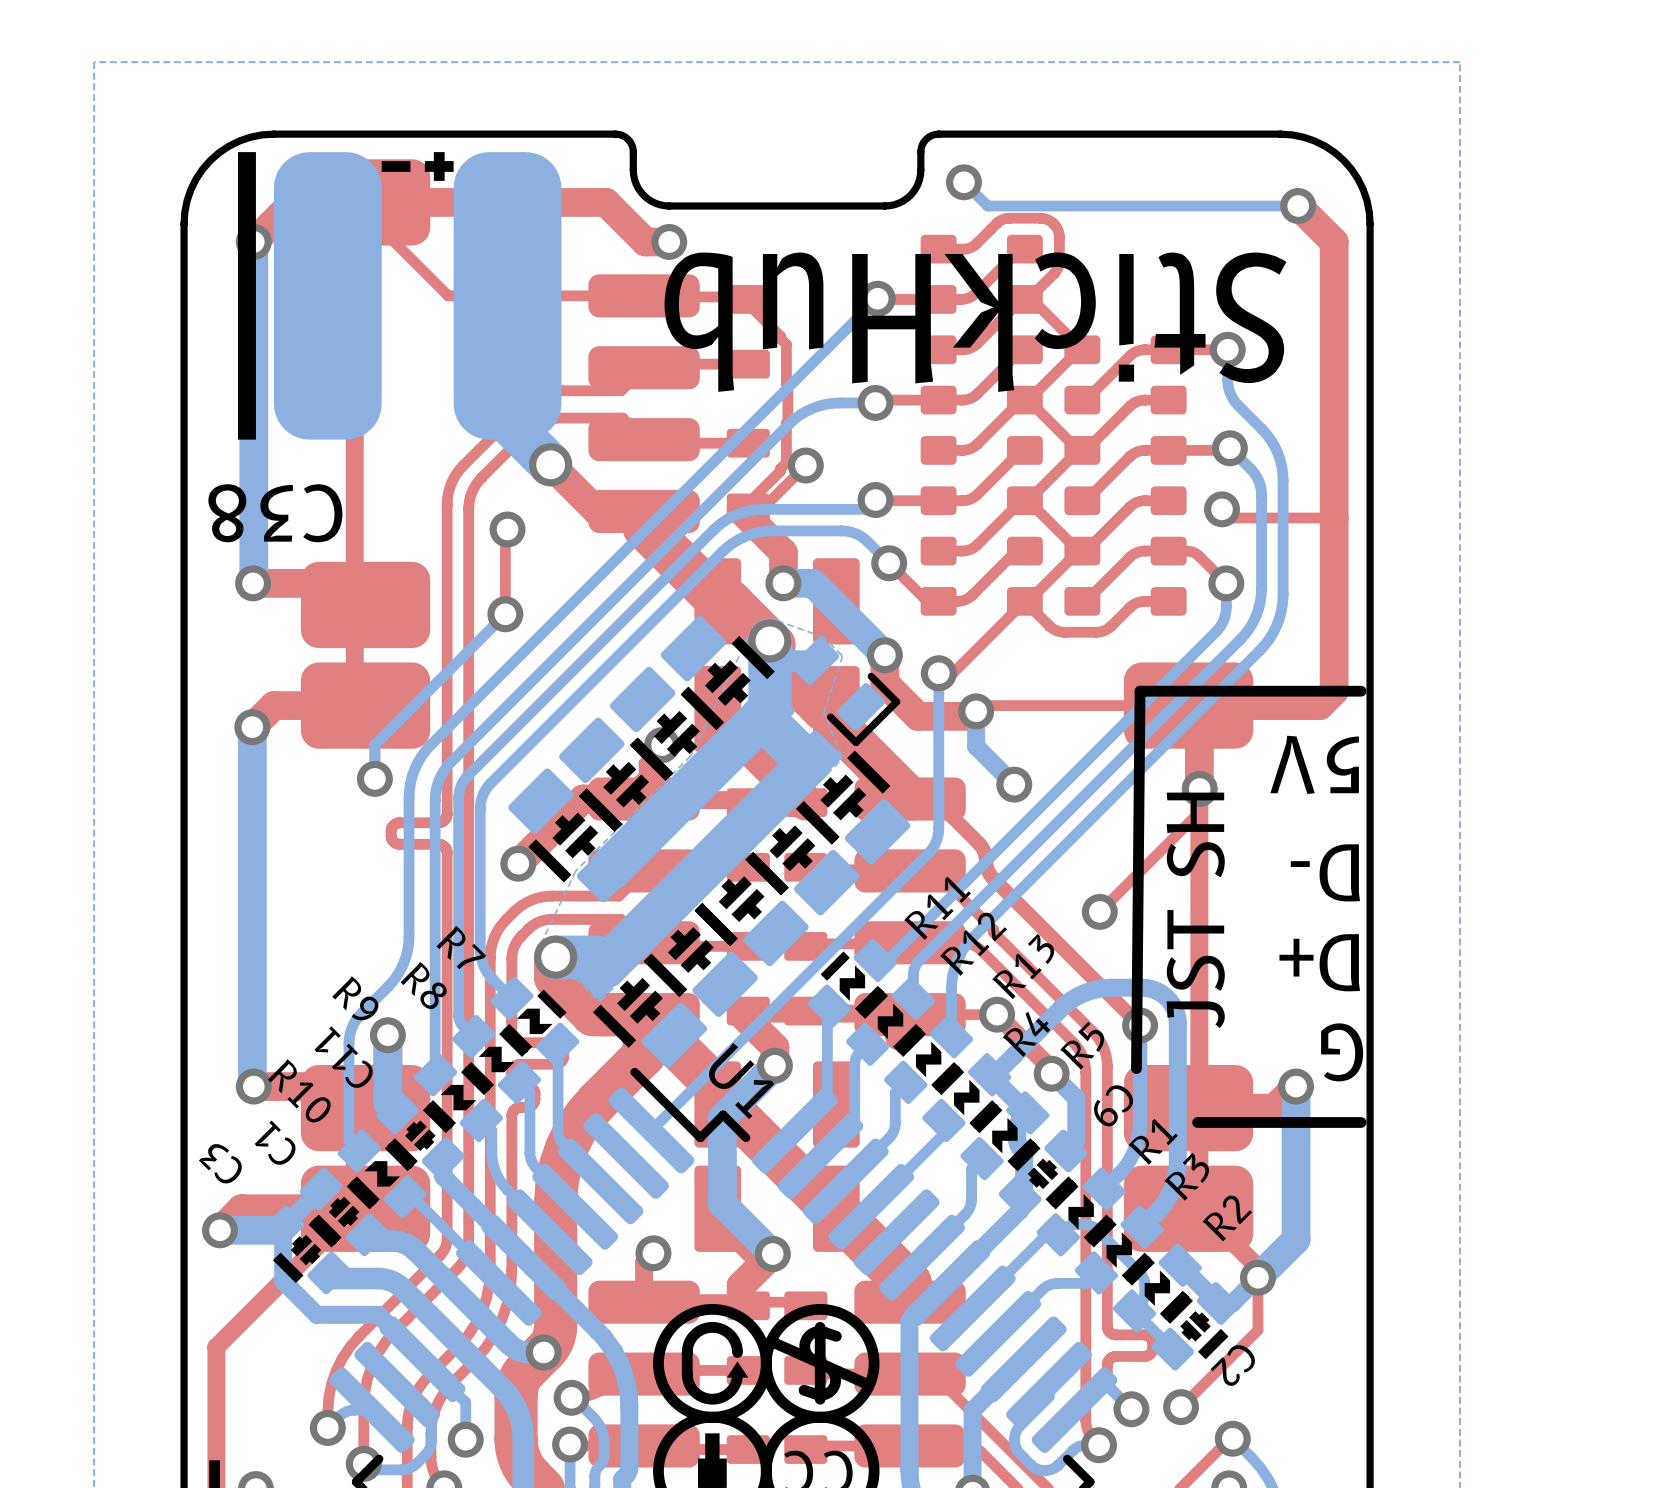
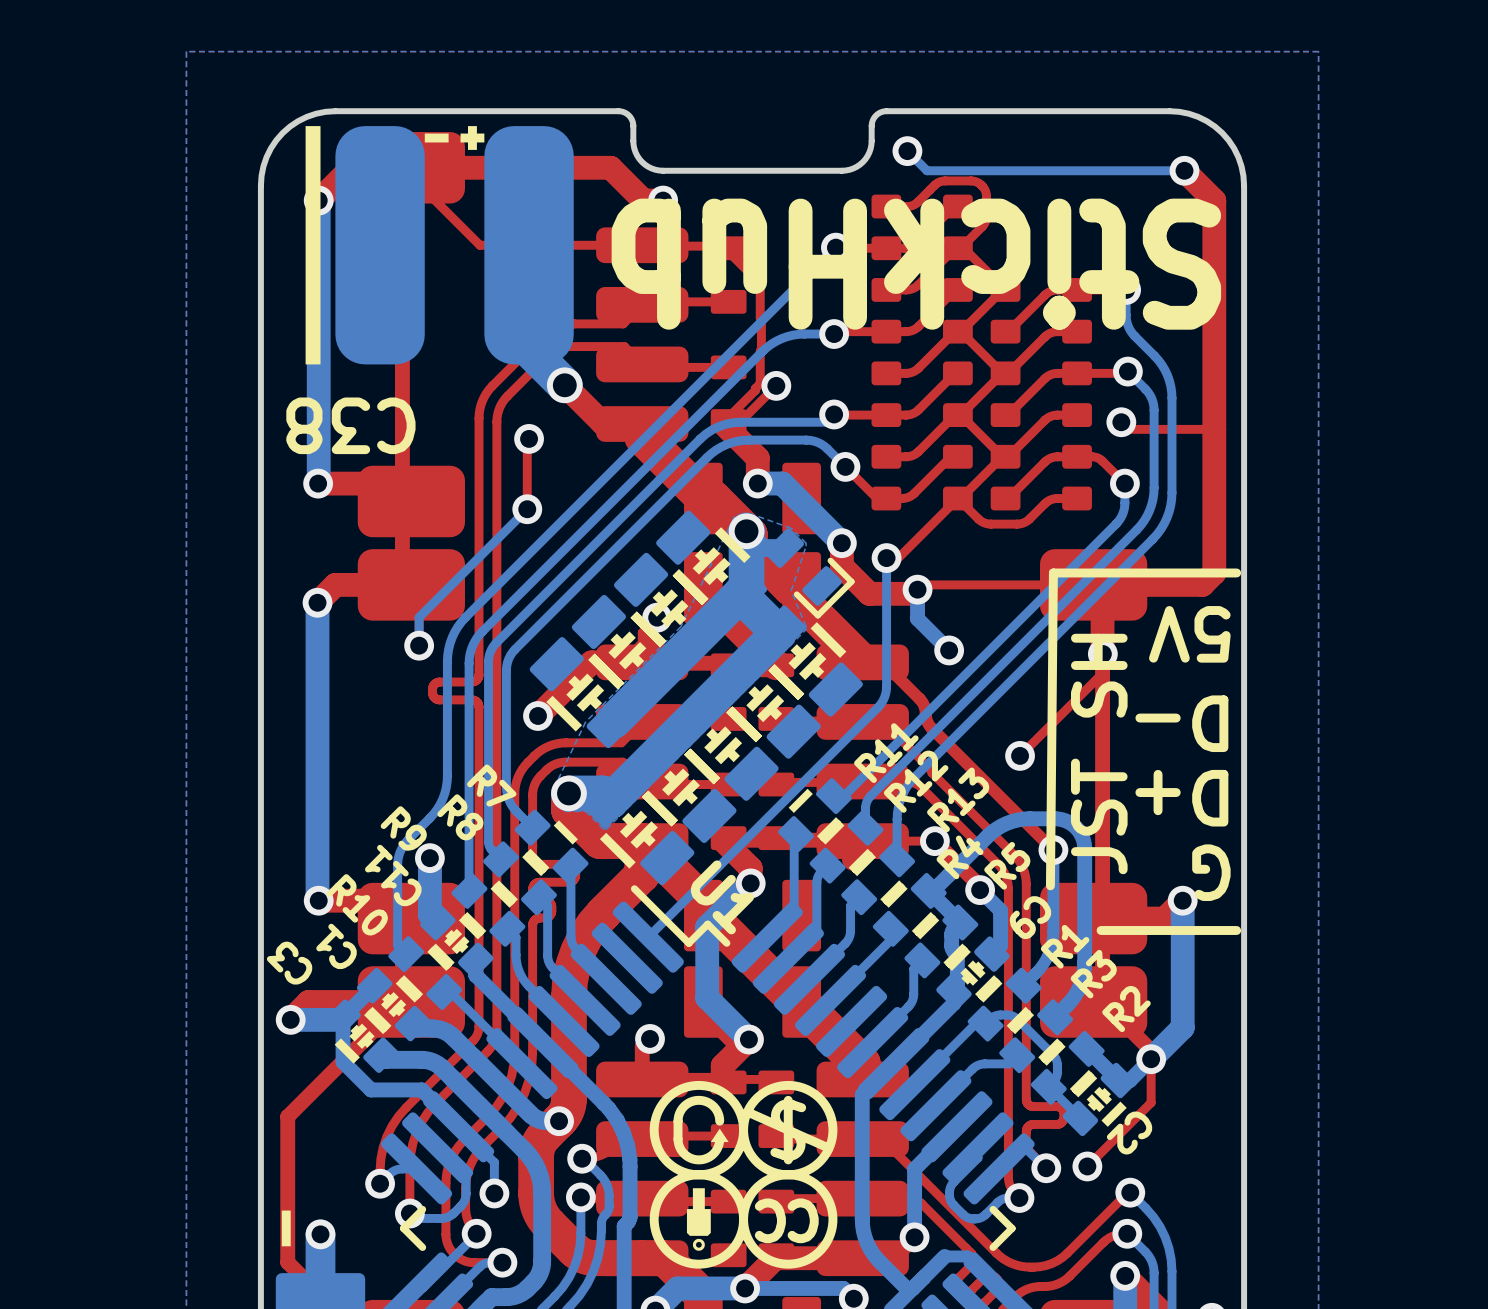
R11 footprint: [807, 938, 897, 1028] -> [778, 778, 852, 853]
R7 footprint: [490, 976, 580, 1066] -> [514, 809, 589, 884]
R12 footprint: [845, 976, 936, 1066] -> [809, 809, 884, 884]
R8 footprint: [452, 1014, 542, 1105] -> [483, 841, 557, 916]
R13 footprint: [884, 1014, 974, 1105] -> [841, 841, 916, 916]
R9 footprint: [413, 1053, 504, 1143] -> [451, 872, 526, 947]
R4 footprint: [922, 1053, 1012, 1143] -> [872, 872, 947, 947]
R5 footprint: [960, 1091, 1050, 1181] -> [904, 904, 979, 979]
R10 footprint: [337, 1129, 427, 1219] -> [388, 936, 463, 1011]
R1 footprint: [1036, 1167, 1126, 1257] -> [967, 967, 1042, 1042]
R3 footprint: [1074, 1205, 1164, 1295] -> [999, 999, 1074, 1074]
R2 footprint: [1112, 1243, 1202, 1333] -> [1030, 1030, 1105, 1105]

